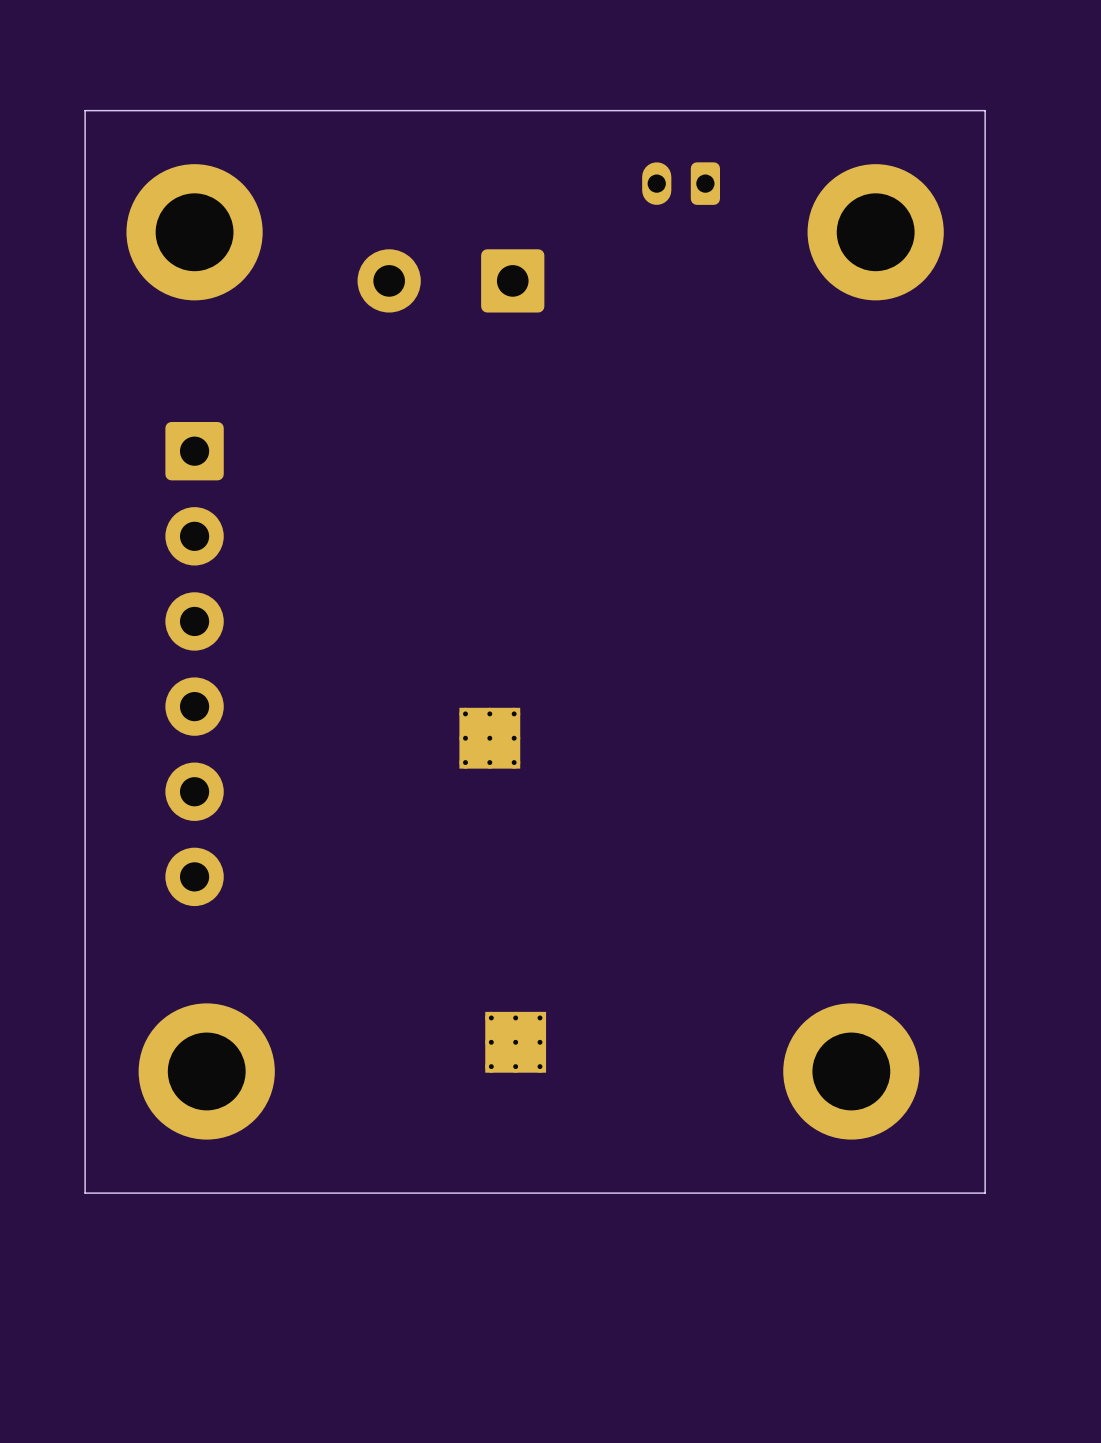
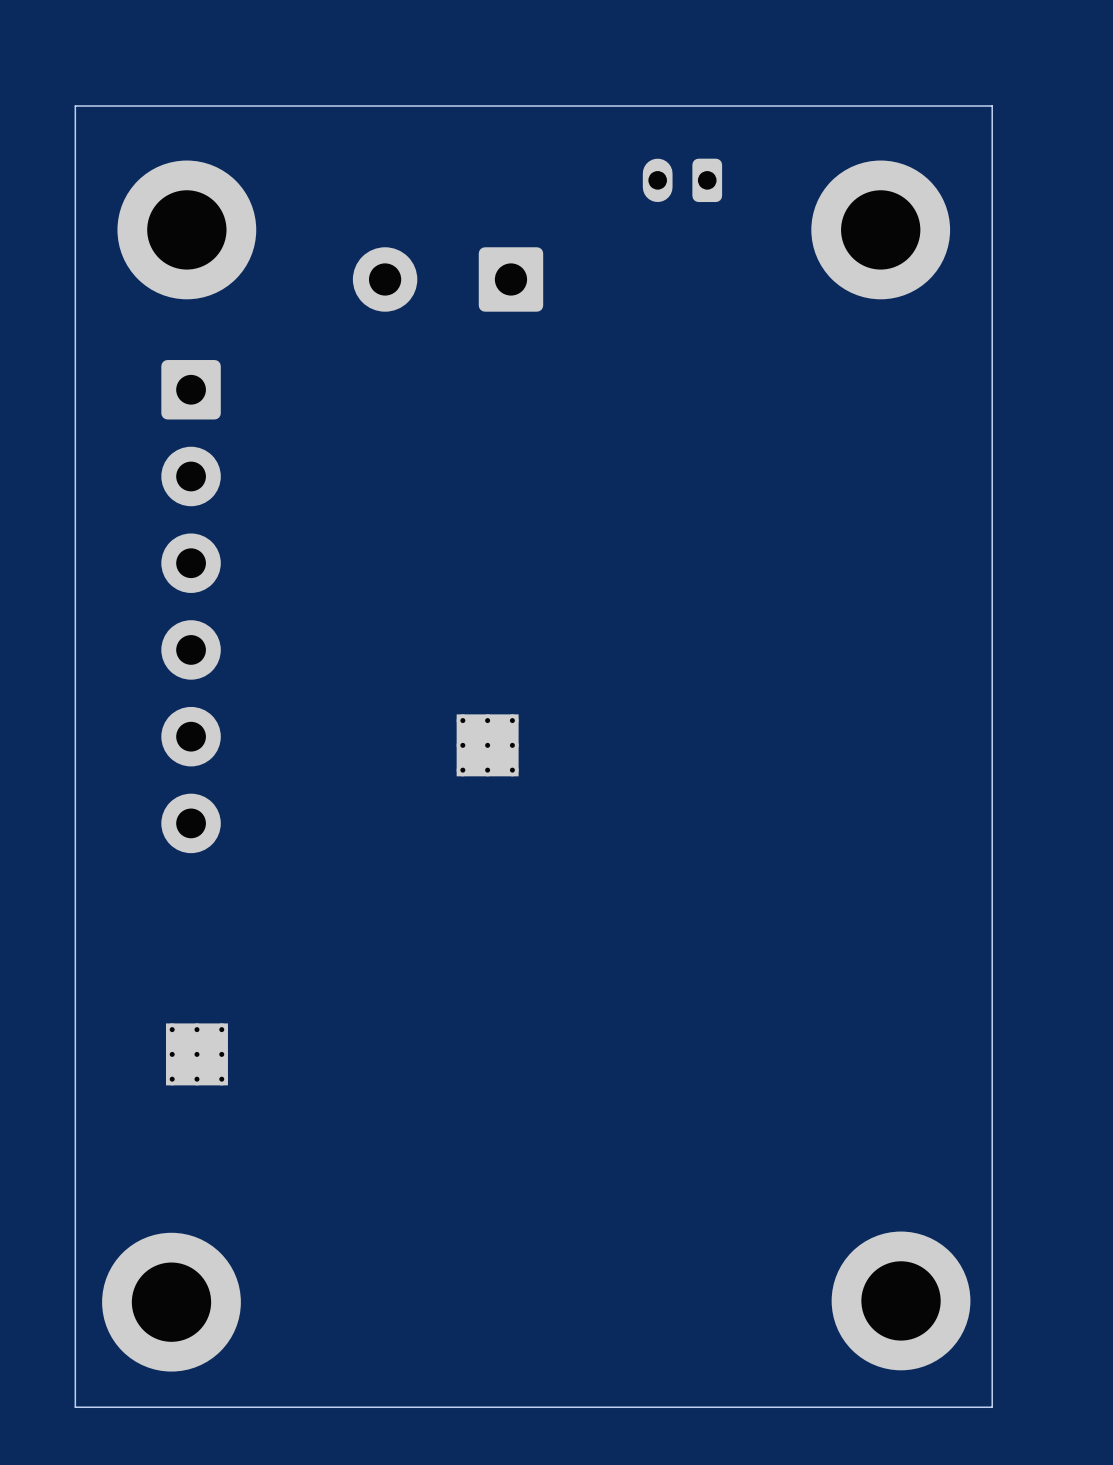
part position: (194, 664) -> (191, 606)
part position: (515, 1042) -> (196, 1054)
part position: (206, 1071) -> (171, 1302)
part position: (851, 1071) -> (901, 1300)
board edge: (985, 1193) (85, 1193) -> (992, 1208) (992, 1407) (75, 1407) (75, 1208)

